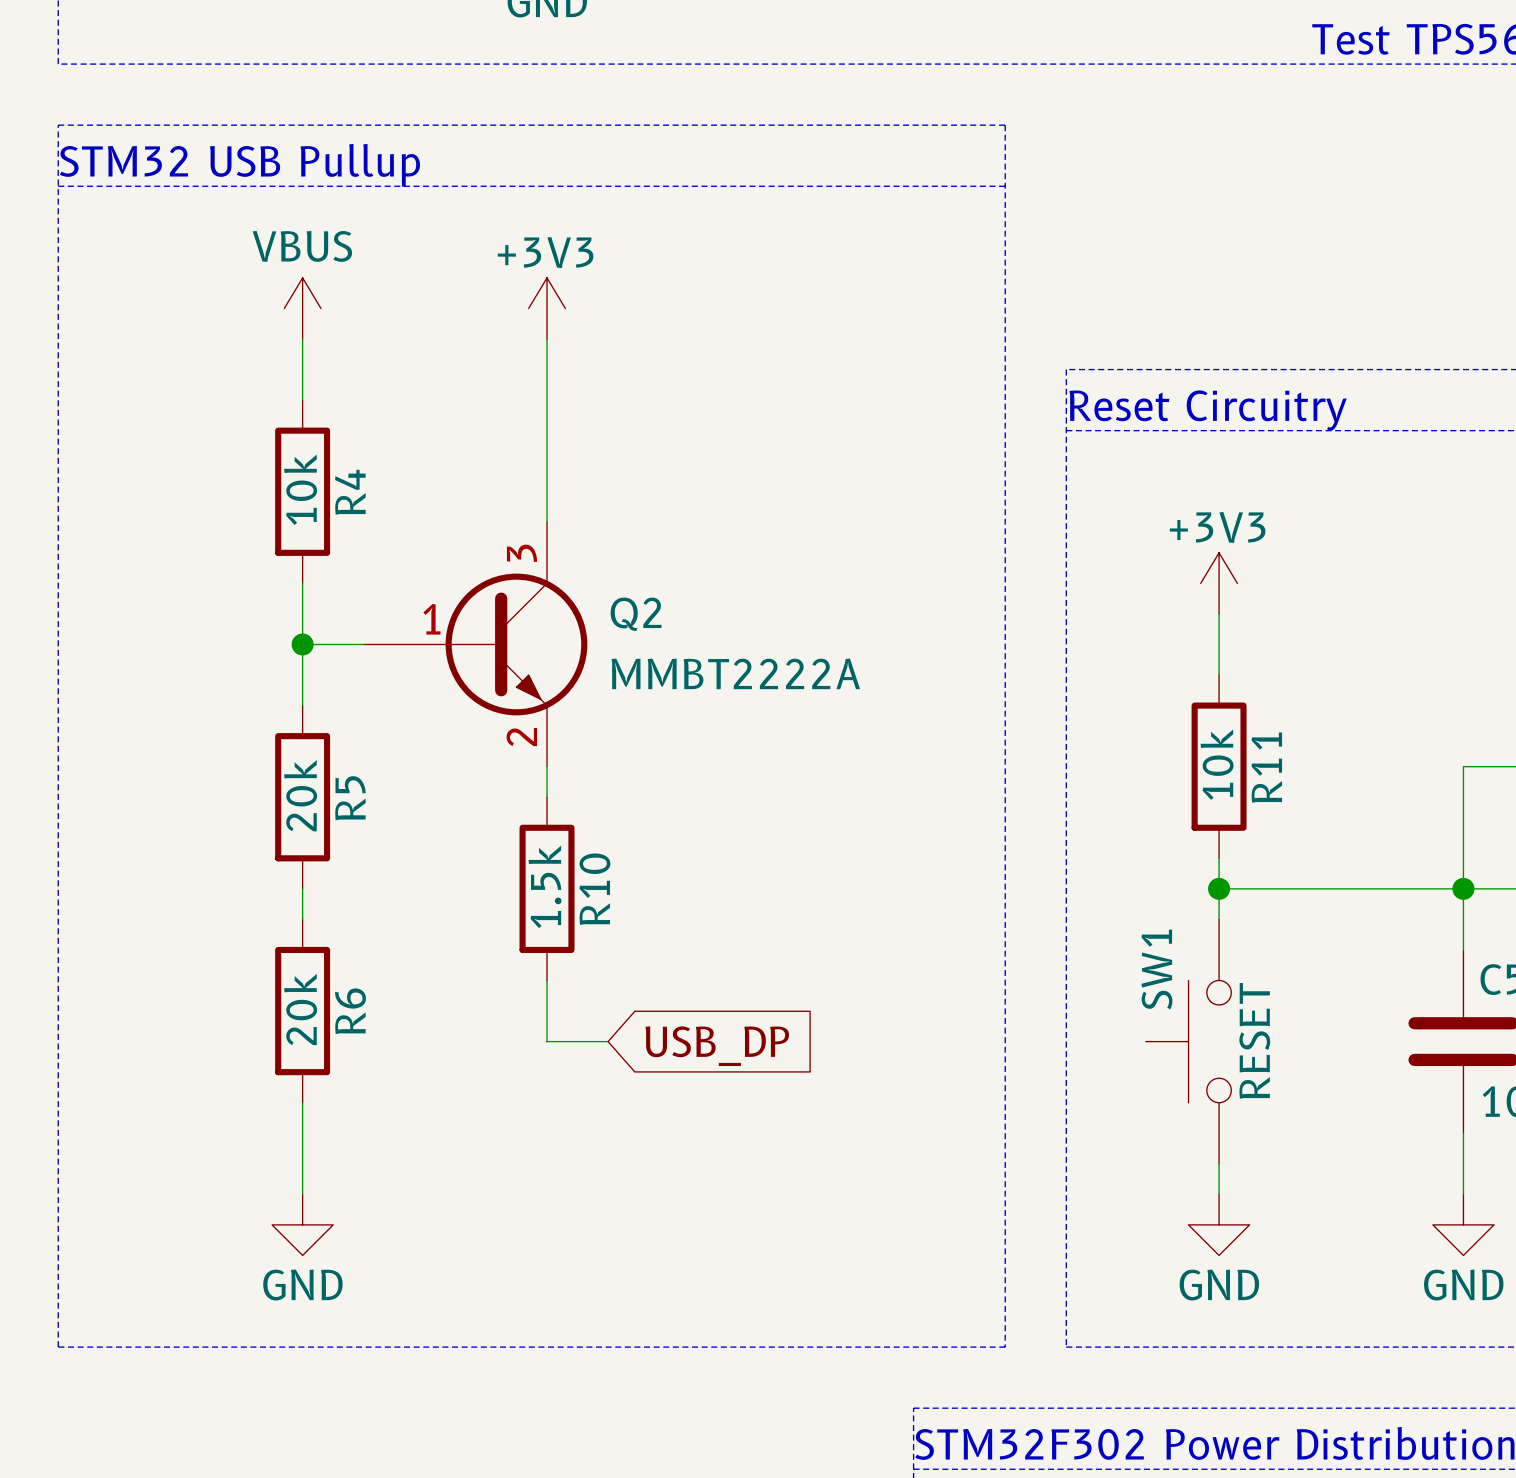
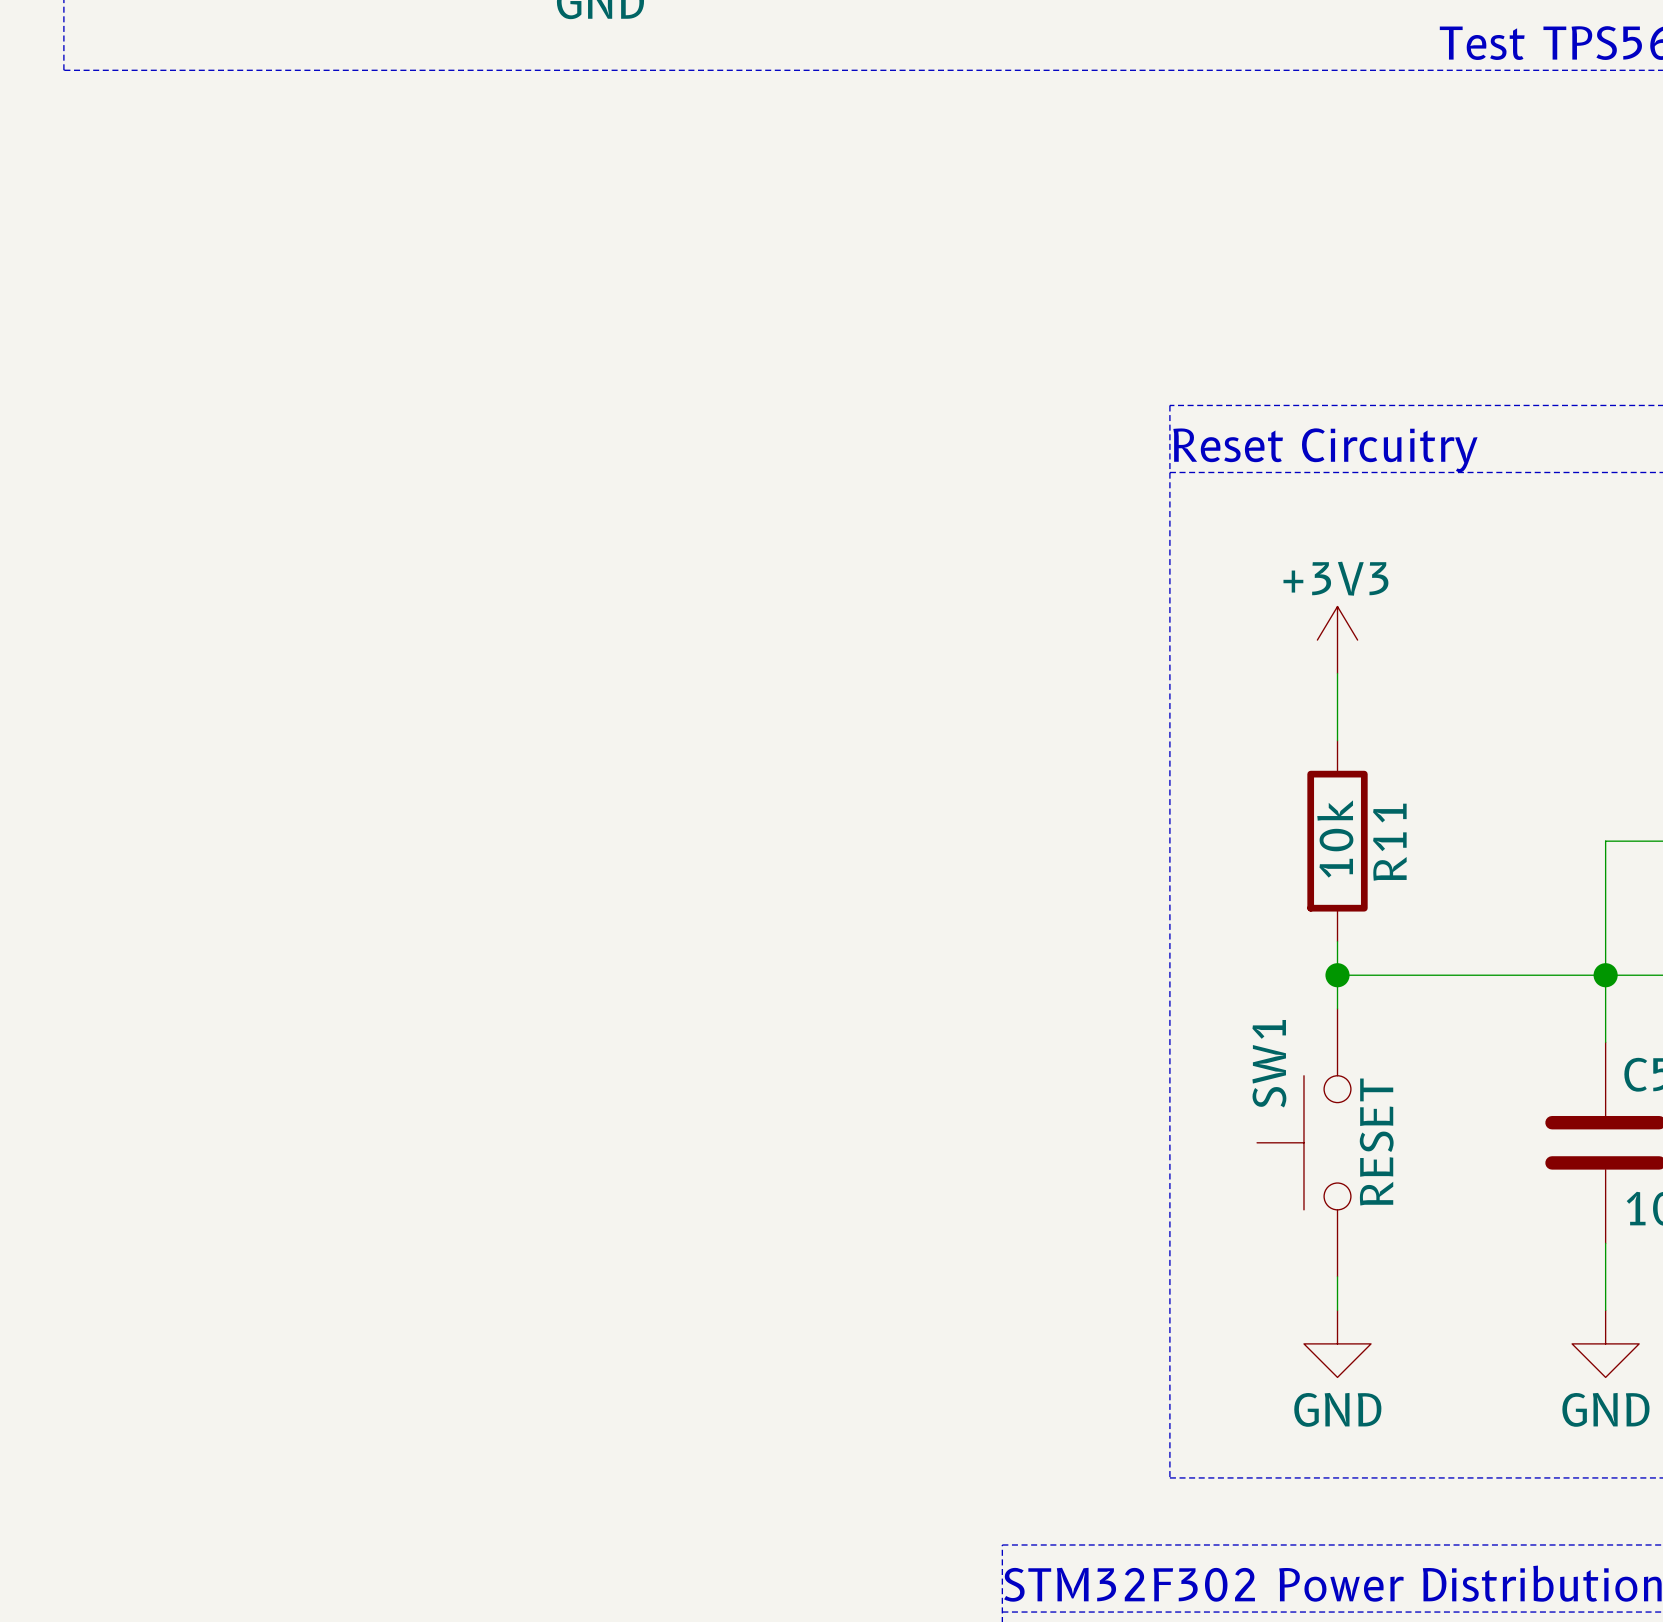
line: (58, 125) (1005, 125) (1005, 1347) (58, 1347) (58, 125) -> none
text: STM32 USB Pullup (239, 165) -> none
line: (58, 186) (1005, 186) -> none
power symbol: VBUS (302, 308) -> none
power symbol: +3V3 (547, 308) -> none
wire: (302, 339) (302, 400) -> none
wire: (547, 339) (547, 522) -> none
R4: 10k (302, 491) -> none
wire: (302, 583) (302, 705) -> none
wire: (302, 644) (363, 644) -> none
junction: (302, 644) -> none
Q2: MMBT2222A (475, 644) -> none
wire: (547, 766) (547, 797) -> none
R5: 20k (302, 797) -> none
wire: (302, 888) (302, 919) -> none
R10: 1.5k (547, 888) -> none
wire: (547, 980) (547, 1041) (608, 1041) -> none
R6: 20k (302, 1011) -> none
global label: USB_DP (717, 1046) -> none
wire: (302, 1102) (302, 1194) -> none
power symbol: GND (302, 1224) -> none

